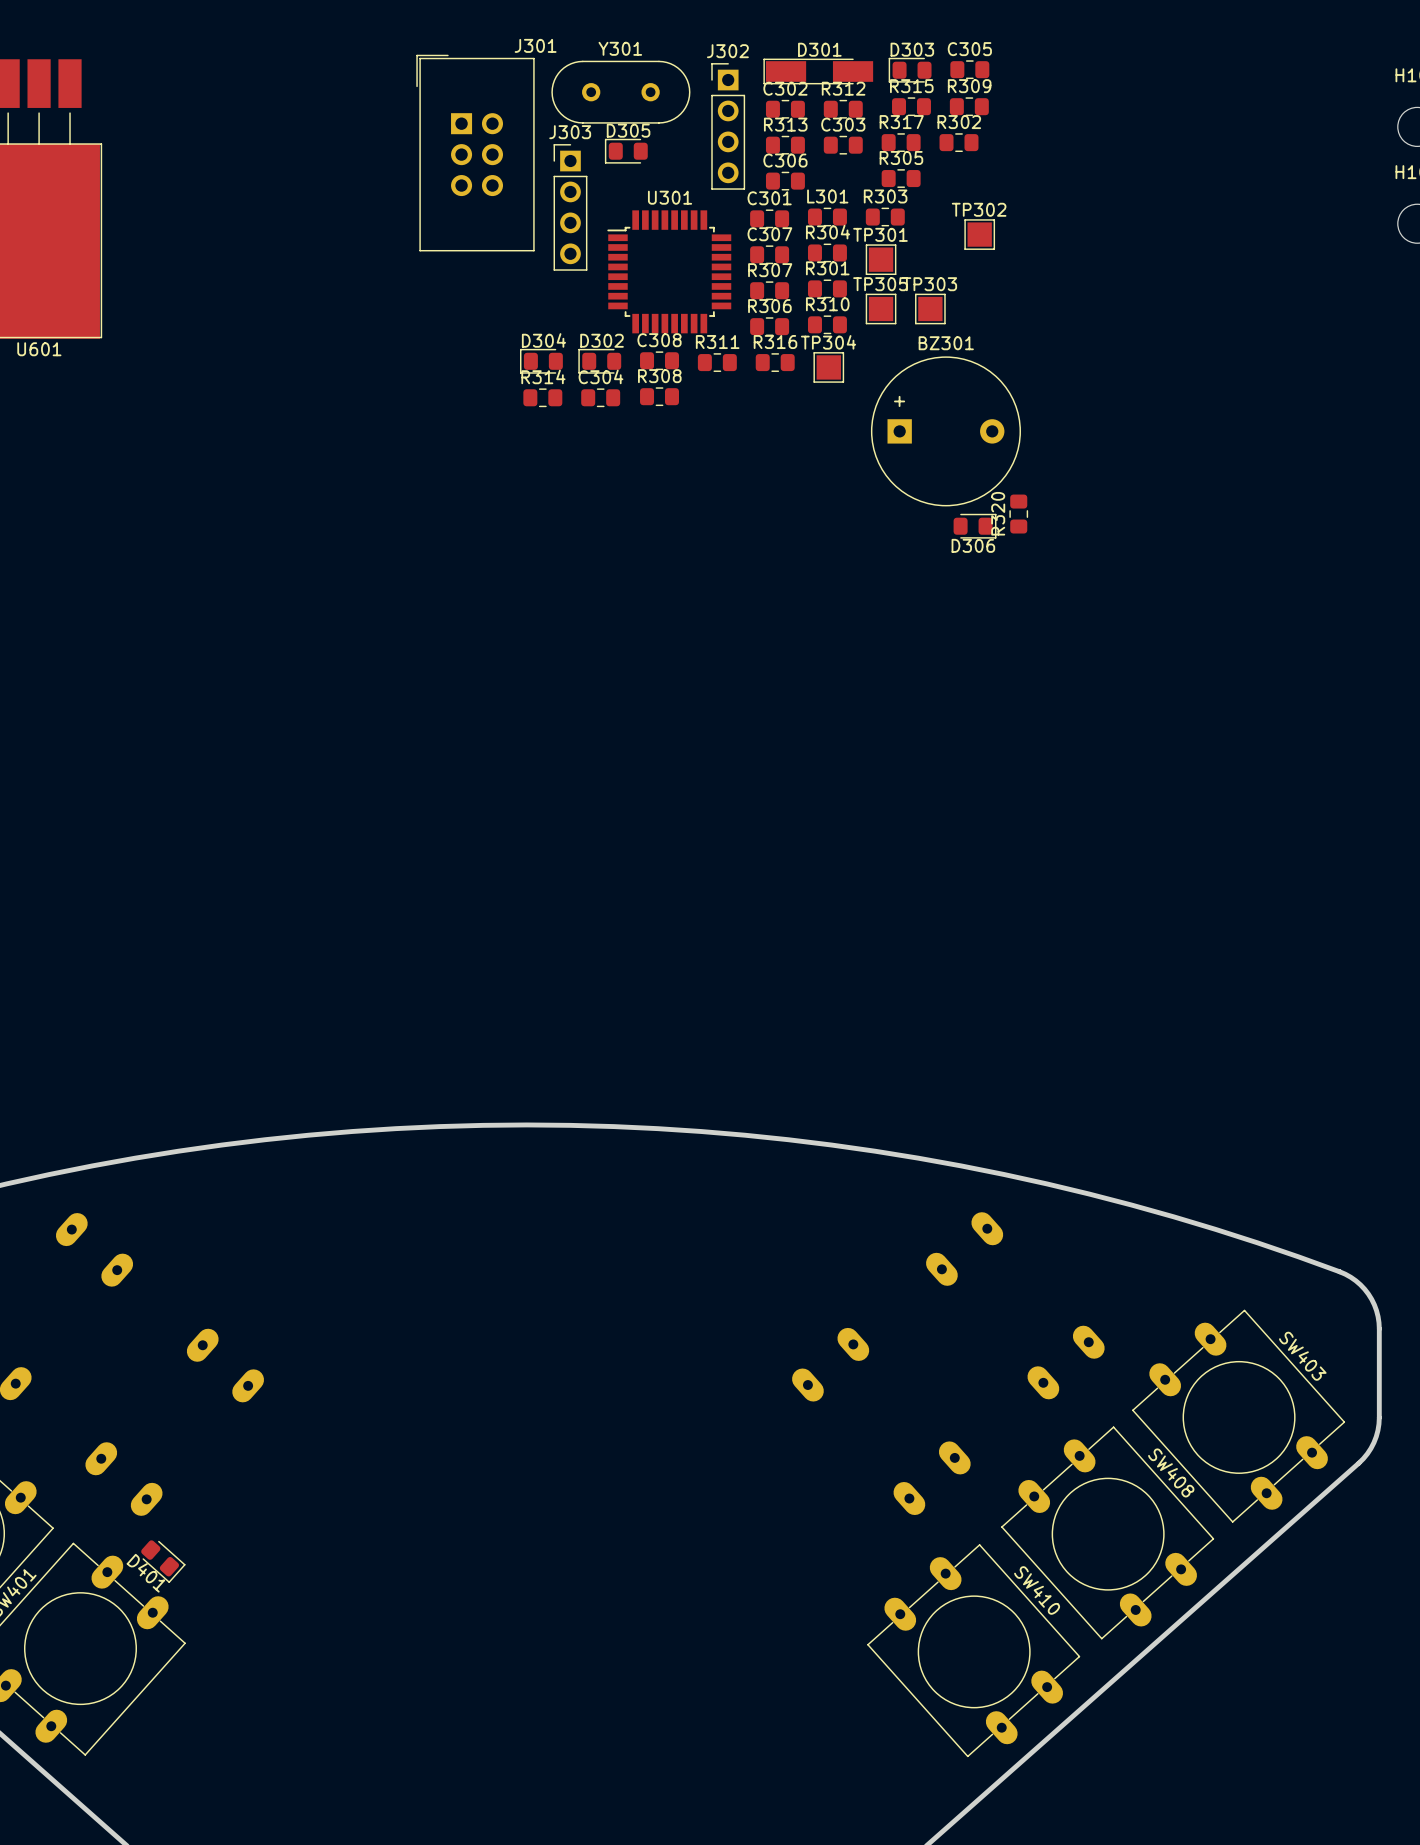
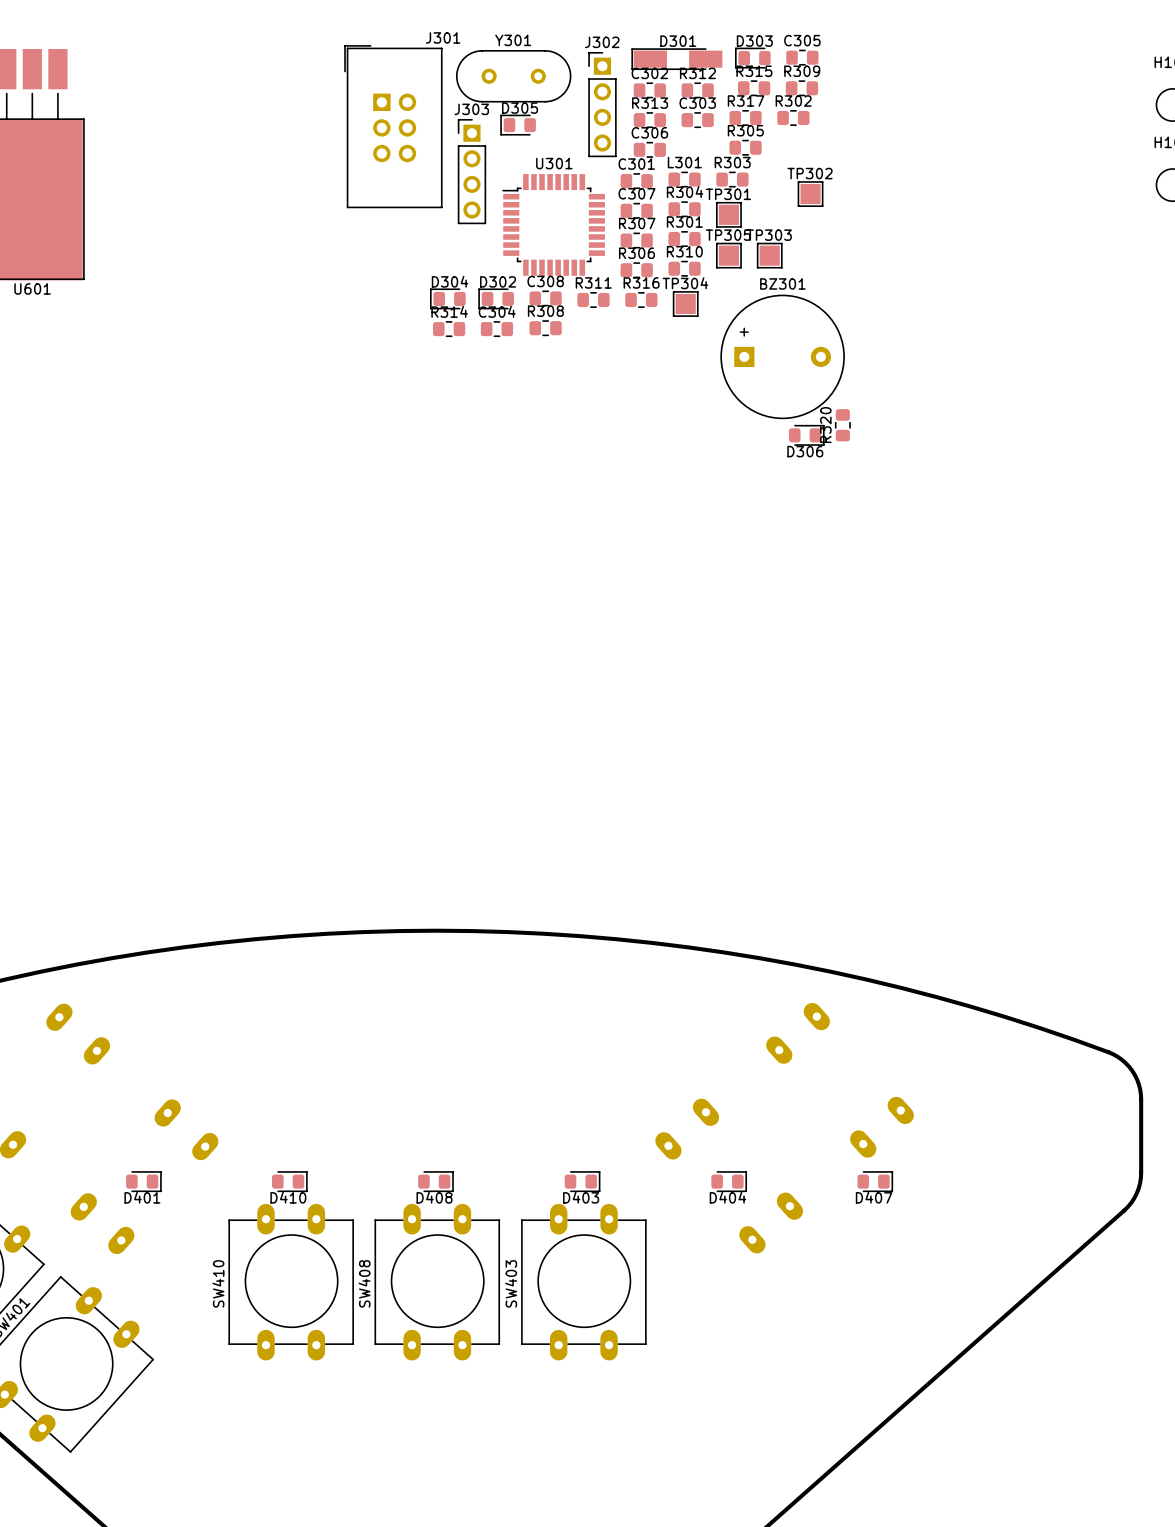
SW403 rotation: 0° (1238, 1416) -> 138.2° counterclockwise (583, 1282)
SW403 position: (1238, 1416) -> (583, 1282)
D410: none -> (289, 1181)
D408: none -> (435, 1181)
D403: none -> (582, 1181)
D404: none -> (729, 1181)
D407: none -> (875, 1181)
SW408 rotation: 0° (1107, 1532) -> 138.2° counterclockwise (437, 1282)
SW408 position: (1107, 1532) -> (437, 1282)
D401 rotation: 0° (163, 1561) -> 41.8° counterclockwise (143, 1181)
D401 position: (163, 1561) -> (143, 1181)
SW410 rotation: 0° (973, 1650) -> 138.2° counterclockwise (291, 1282)
SW410 position: (973, 1650) -> (291, 1282)

